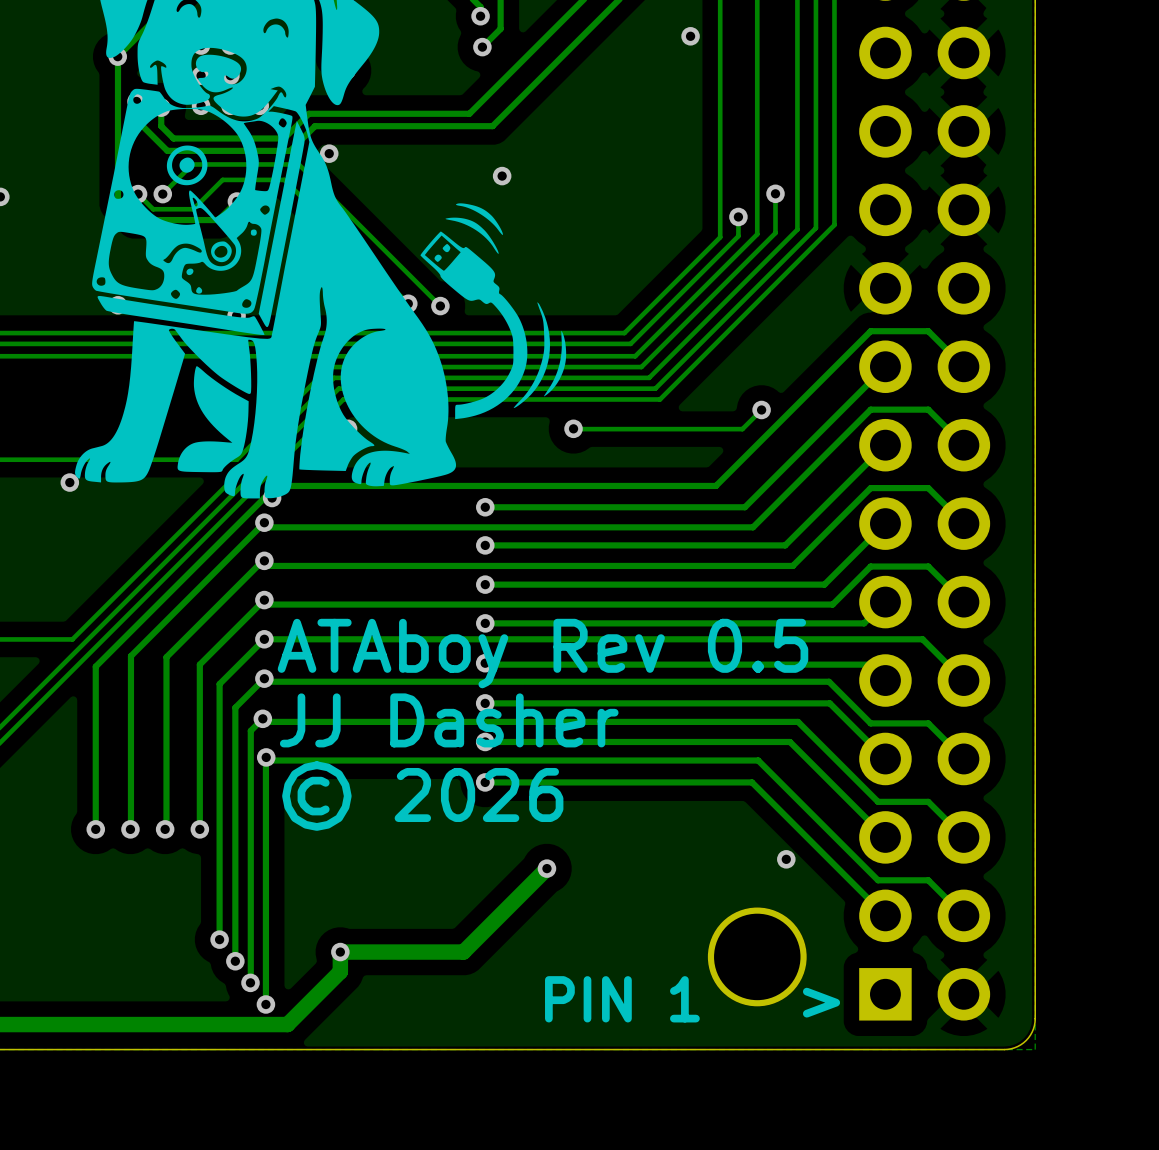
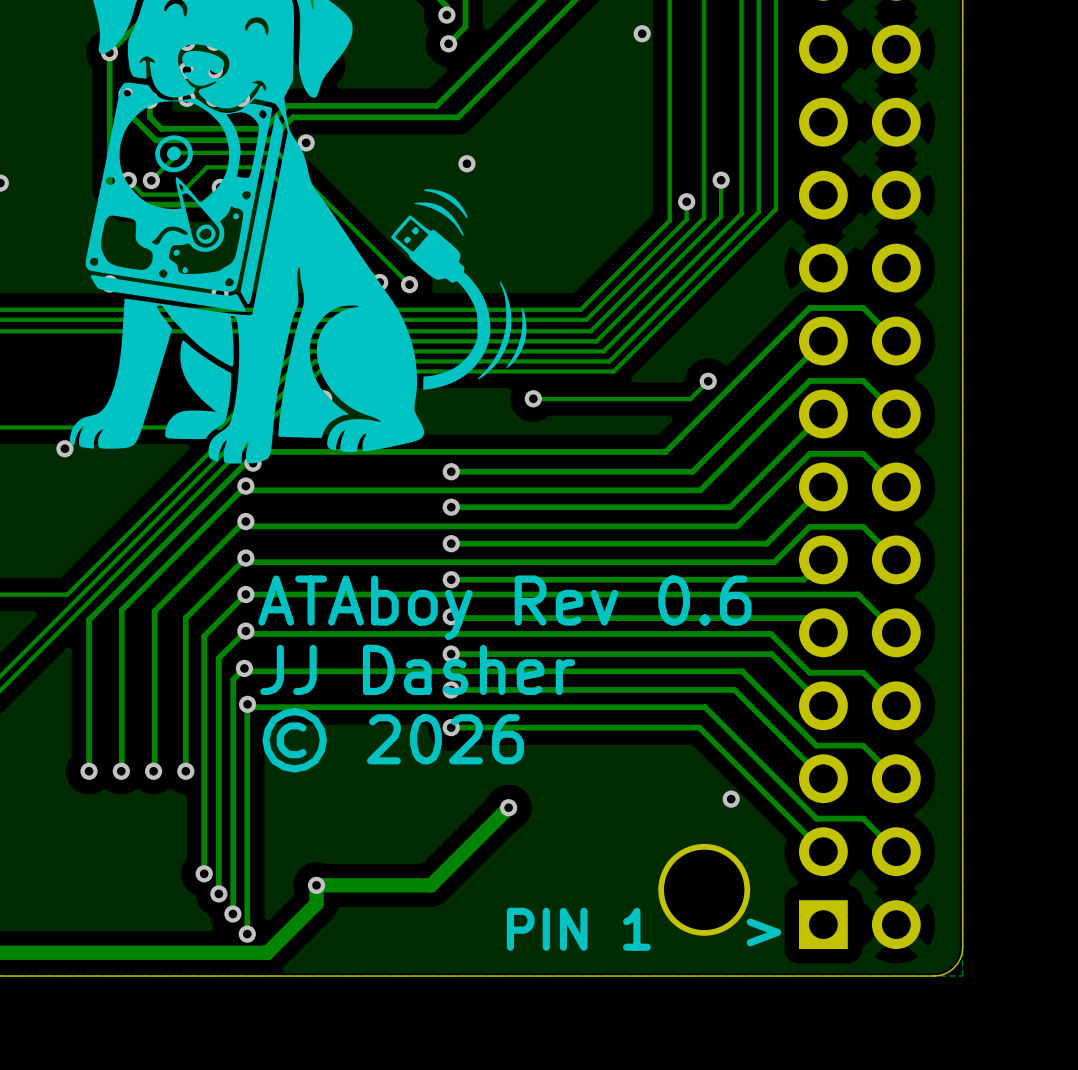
text: ATAboy Rev 0.5 (542, 653) -> ATAboy Rev 0.6 (504, 607)

